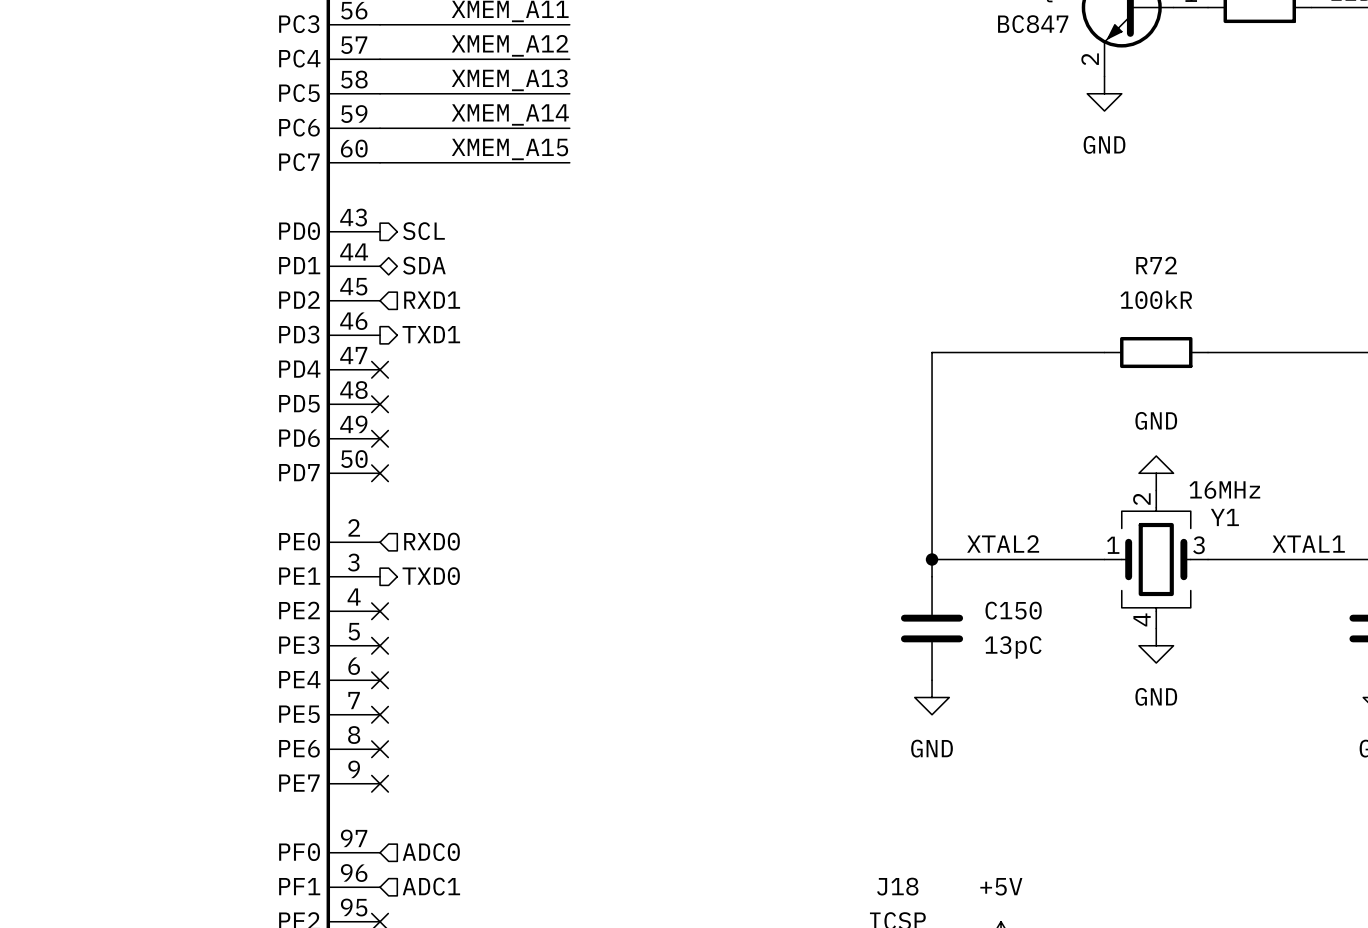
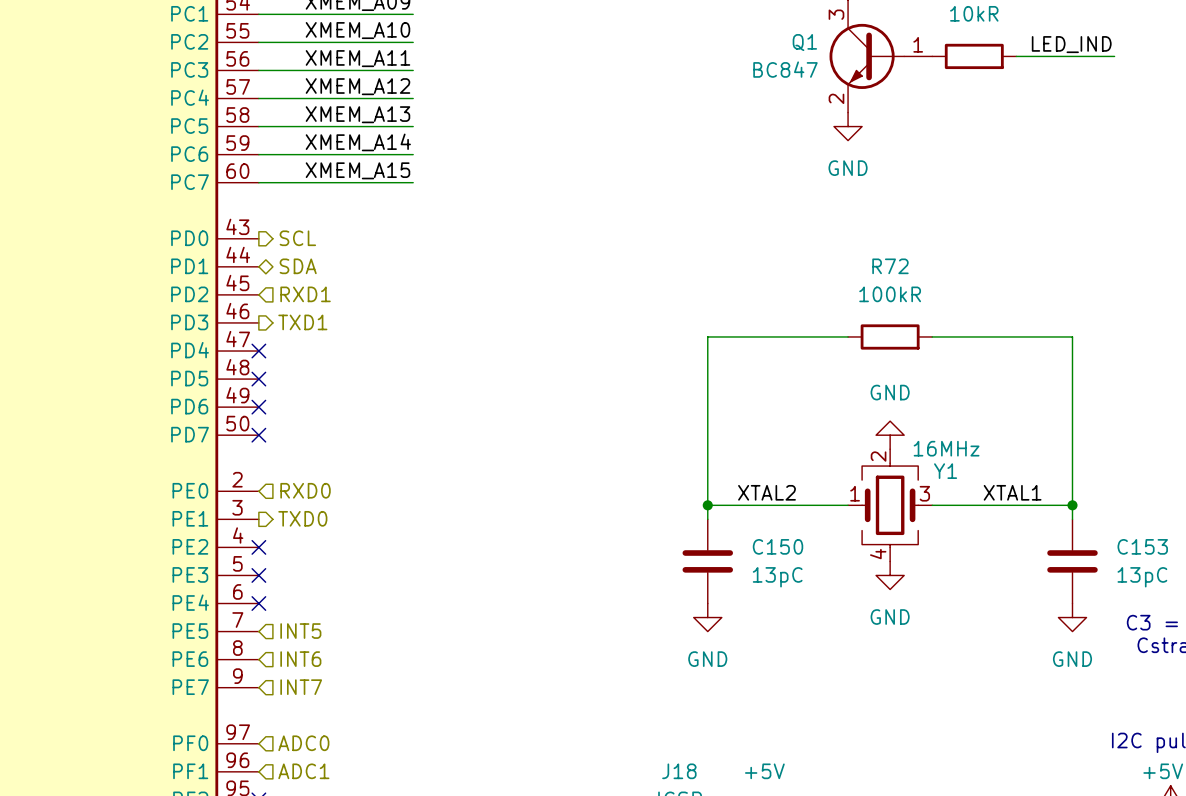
no-connect mark: (380, 714) -> none
hierarchical label: none -> INT5 (300, 631)
hierarchical label: none -> INT6 (300, 659)
no-connect mark: (380, 749) -> none
no-connect mark: (380, 783) -> none
hierarchical label: none -> INT7 (301, 687)

